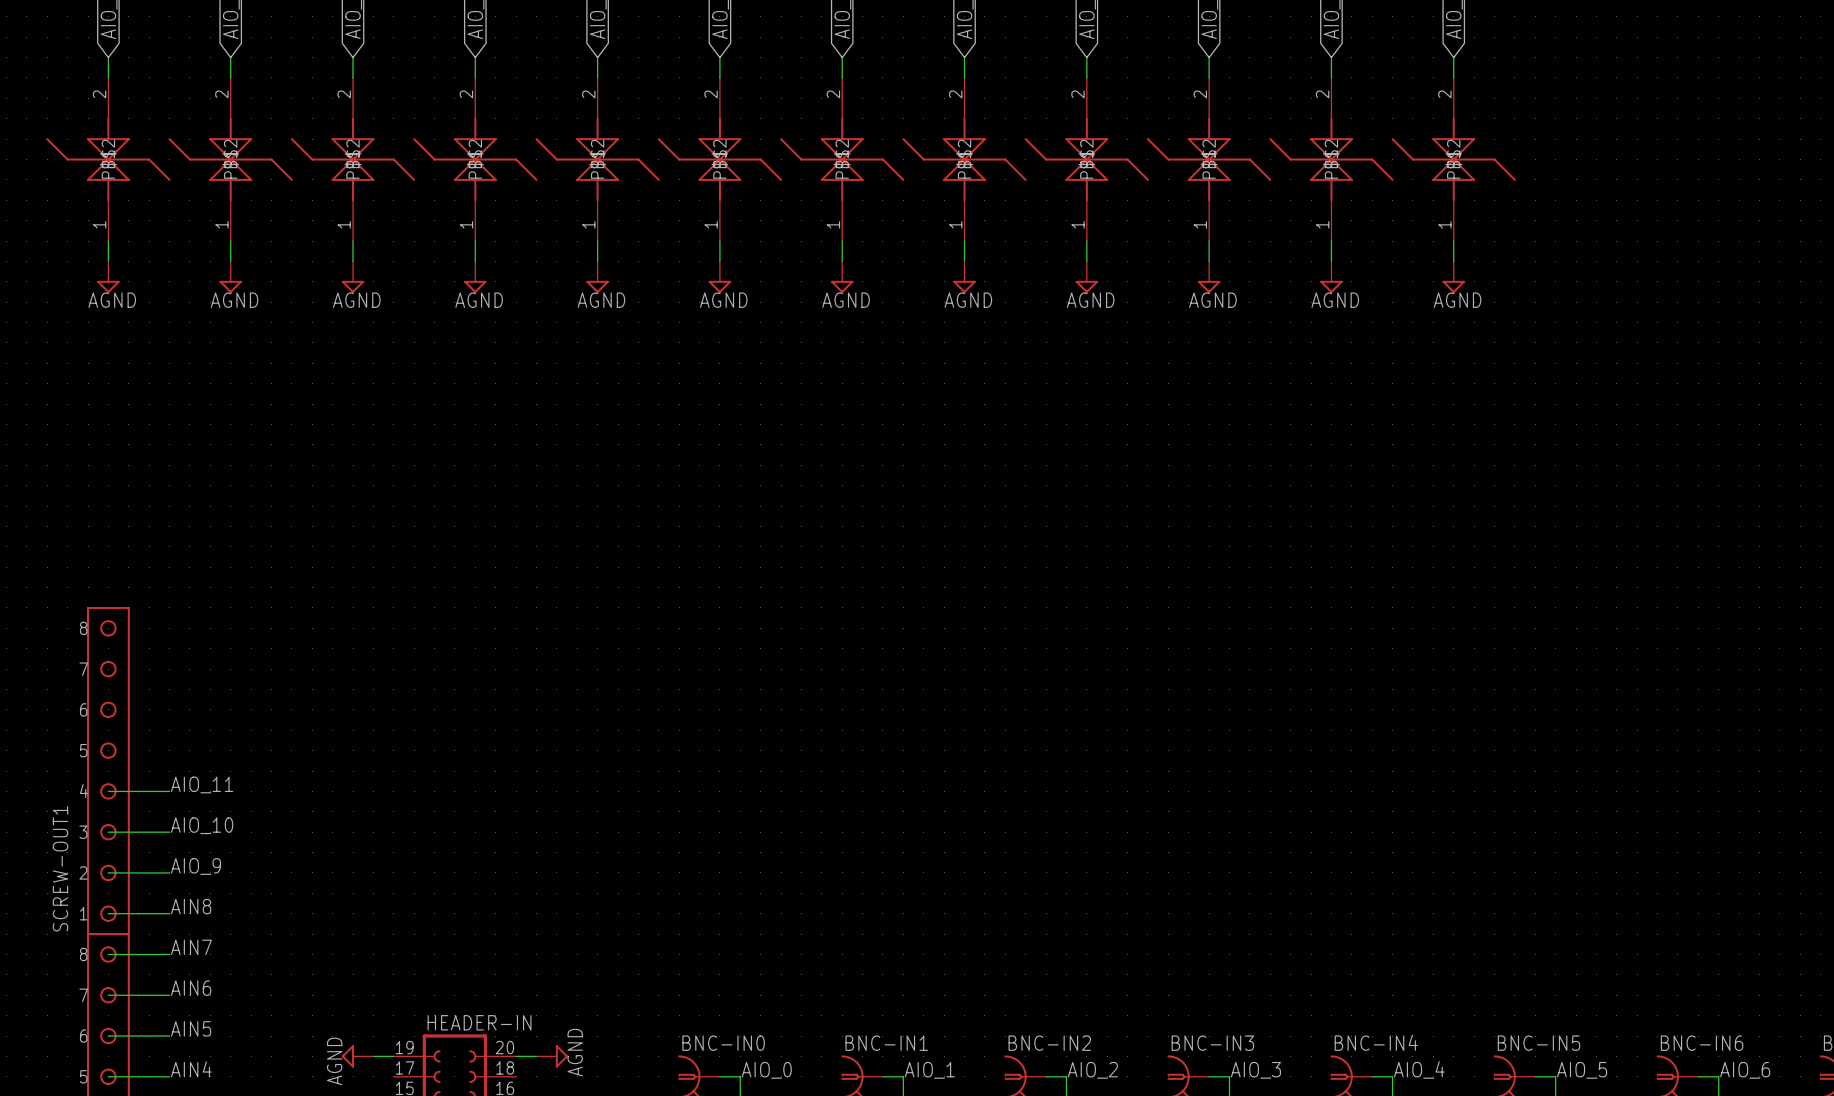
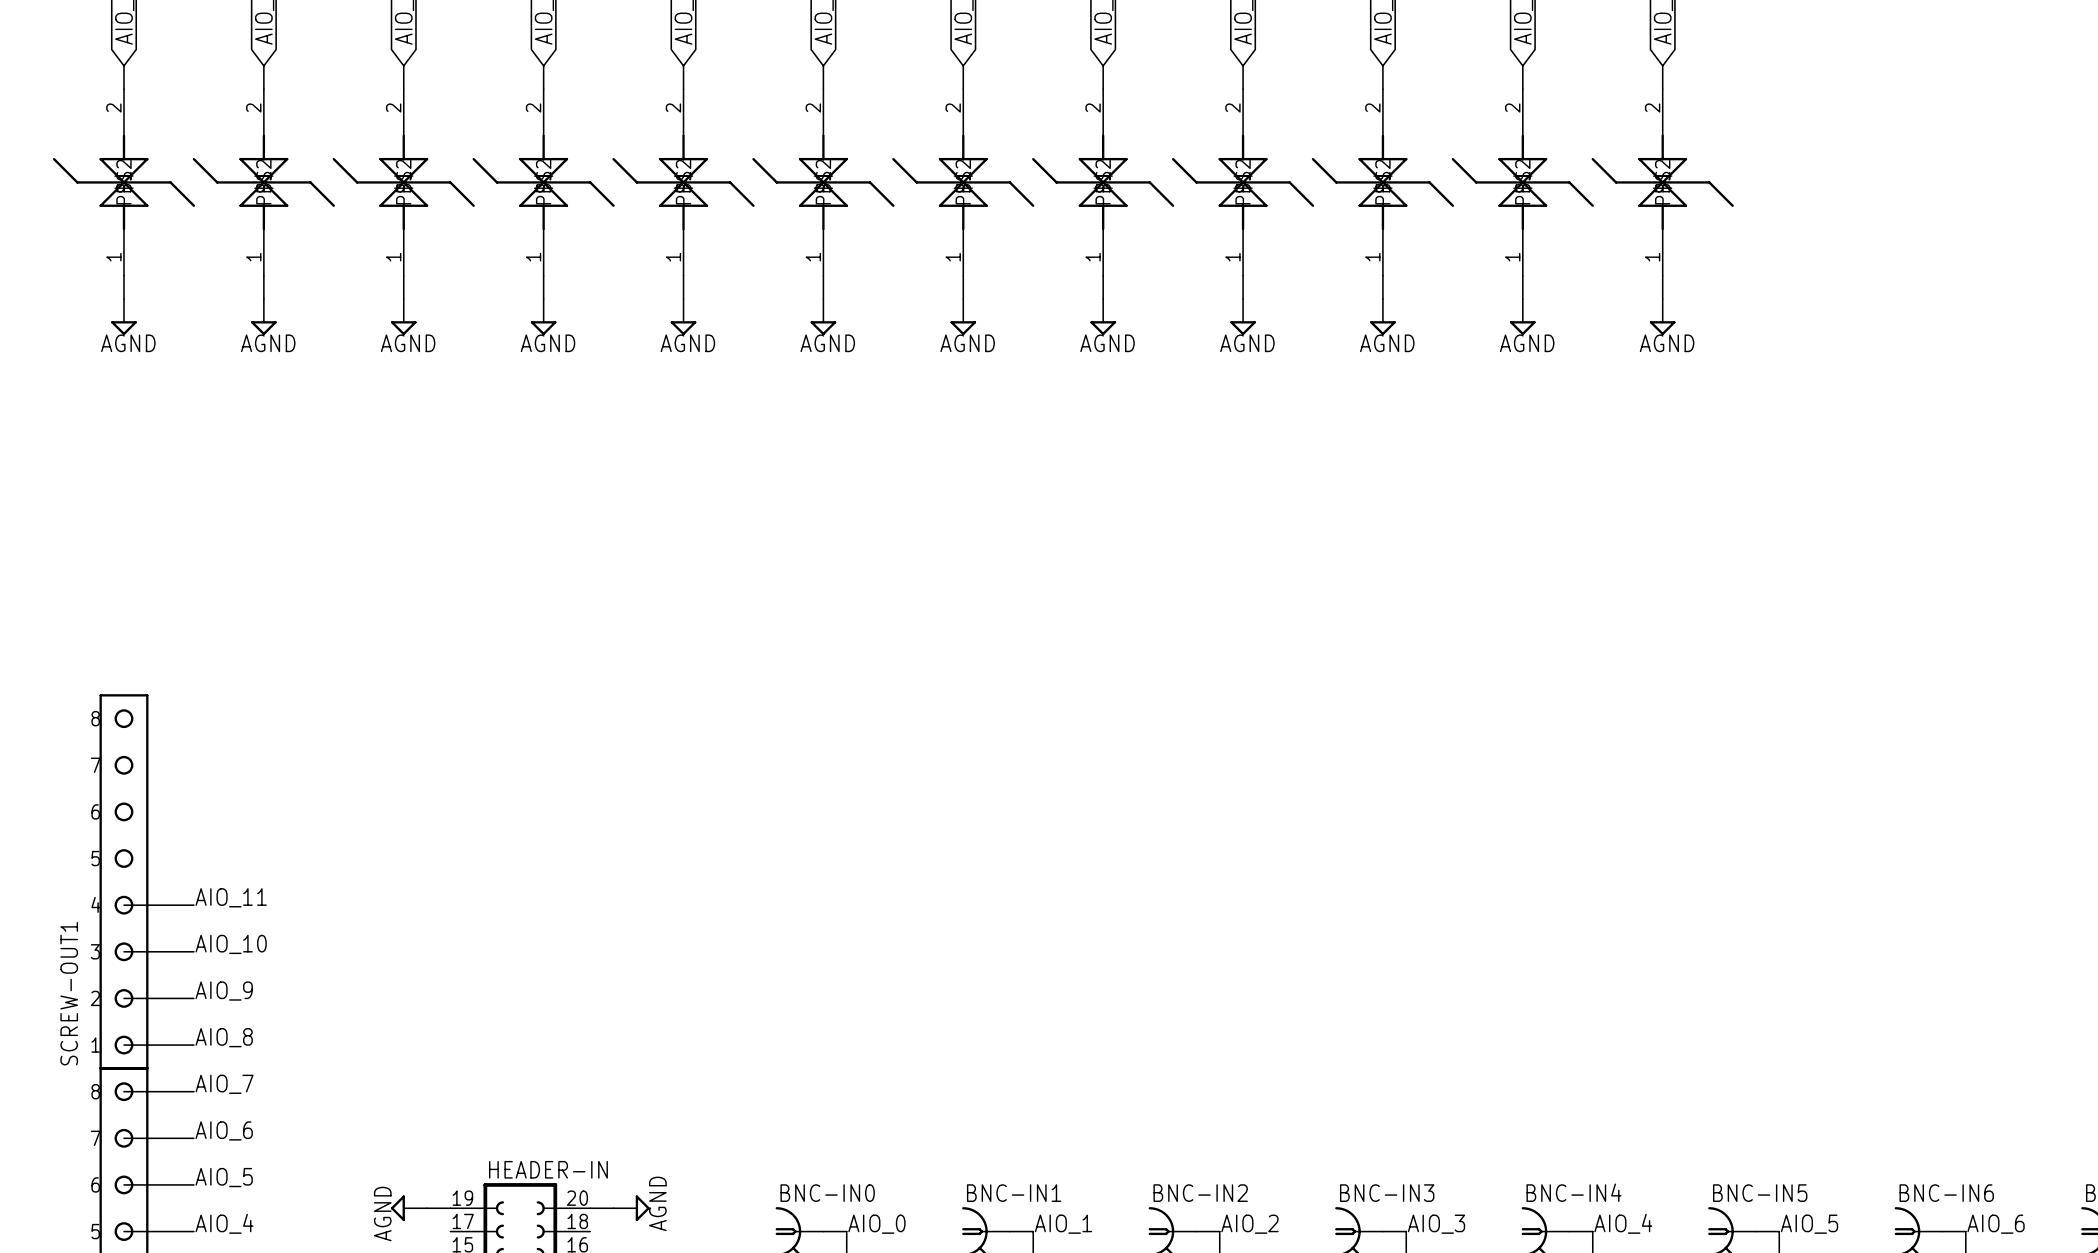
label: AIN8 (191, 906) -> AIO_8 (224, 1037)
label: AIN7 (191, 947) -> AIO_7 (224, 1084)
label: AIN6 (191, 988) -> AIO_6 (224, 1130)
label: AIN5 (191, 1028) -> AIO_5 (224, 1177)
label: AIN4 (191, 1069) -> AIO_4 (224, 1223)

